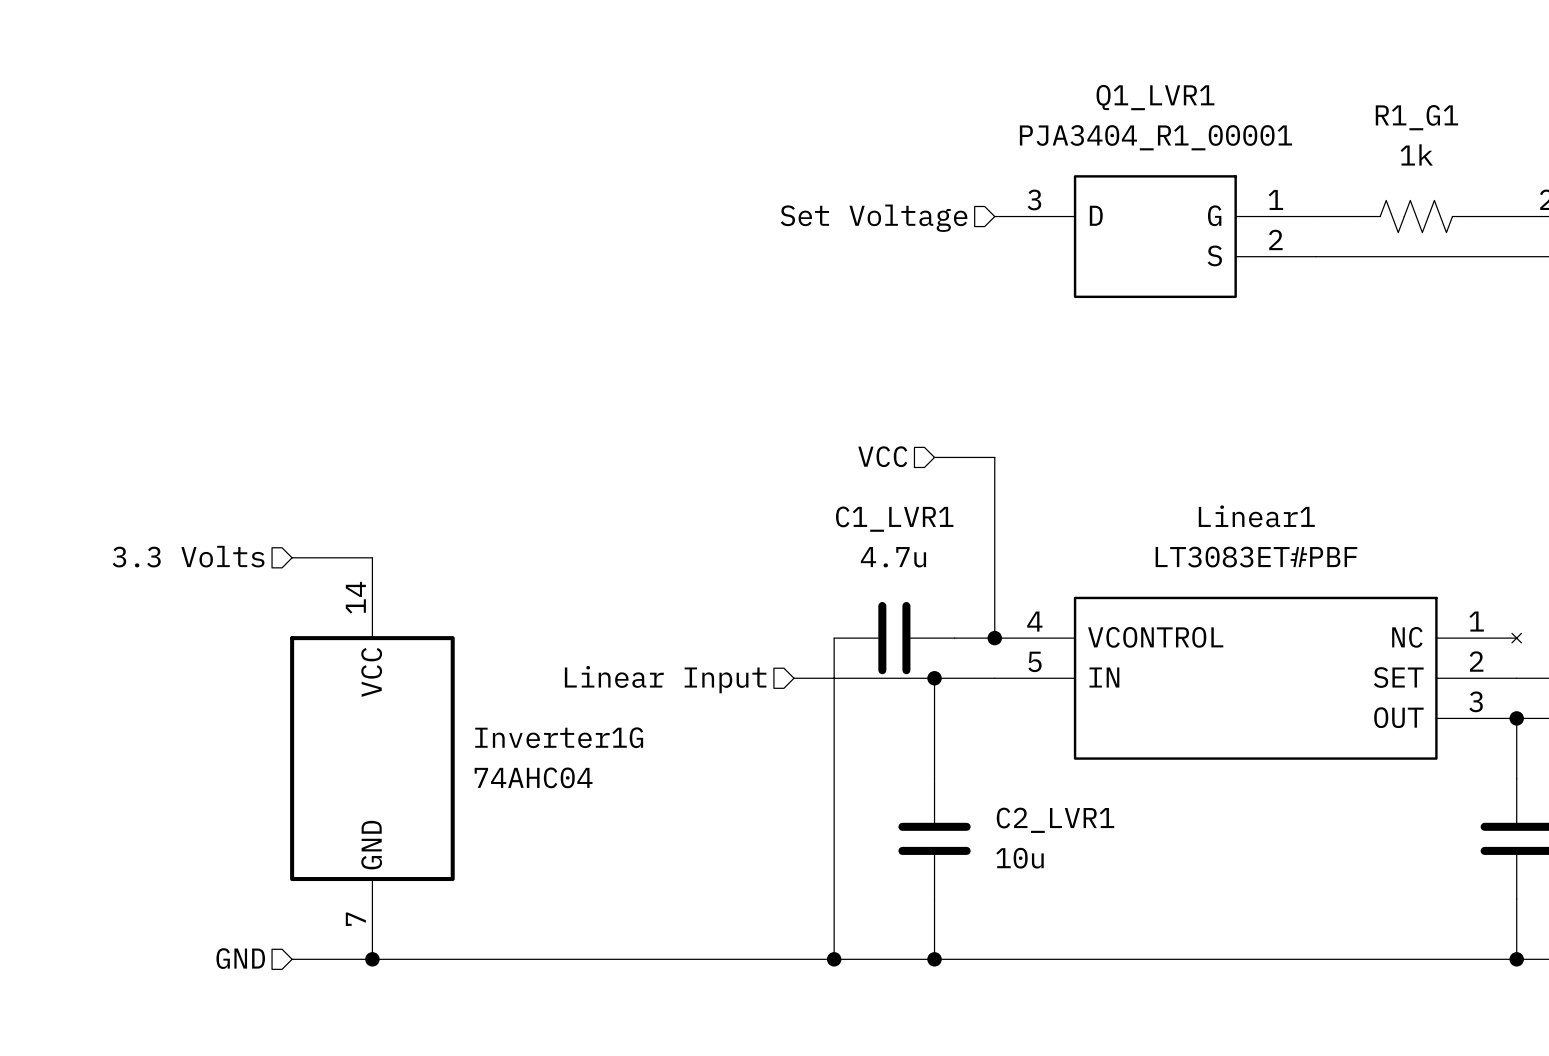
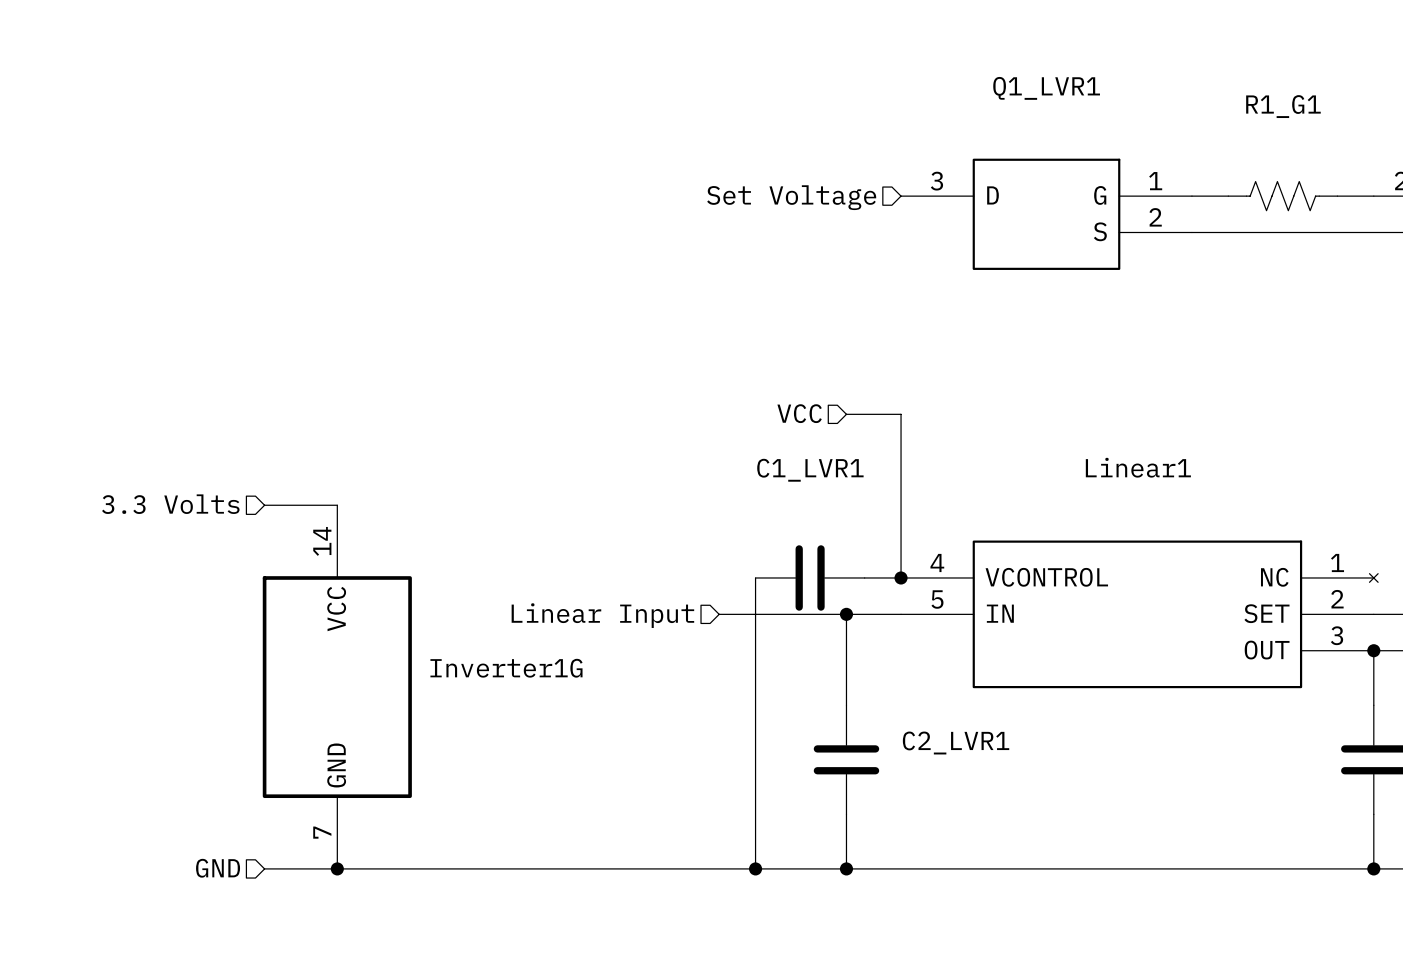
Q1_LVR1 value: PJA3404_R1_00001 (1155, 137) -> none
R1_G1 value: 1k (1416, 154) -> none
C1_LVR1 value: 4.7u (893, 557) -> none
Linear1 value: LT3083ET#PBF (1256, 557) -> none
Inverter1G value: 74AHC04 (533, 777) -> none
C2_LVR1 value: 10u (1019, 858) -> none

